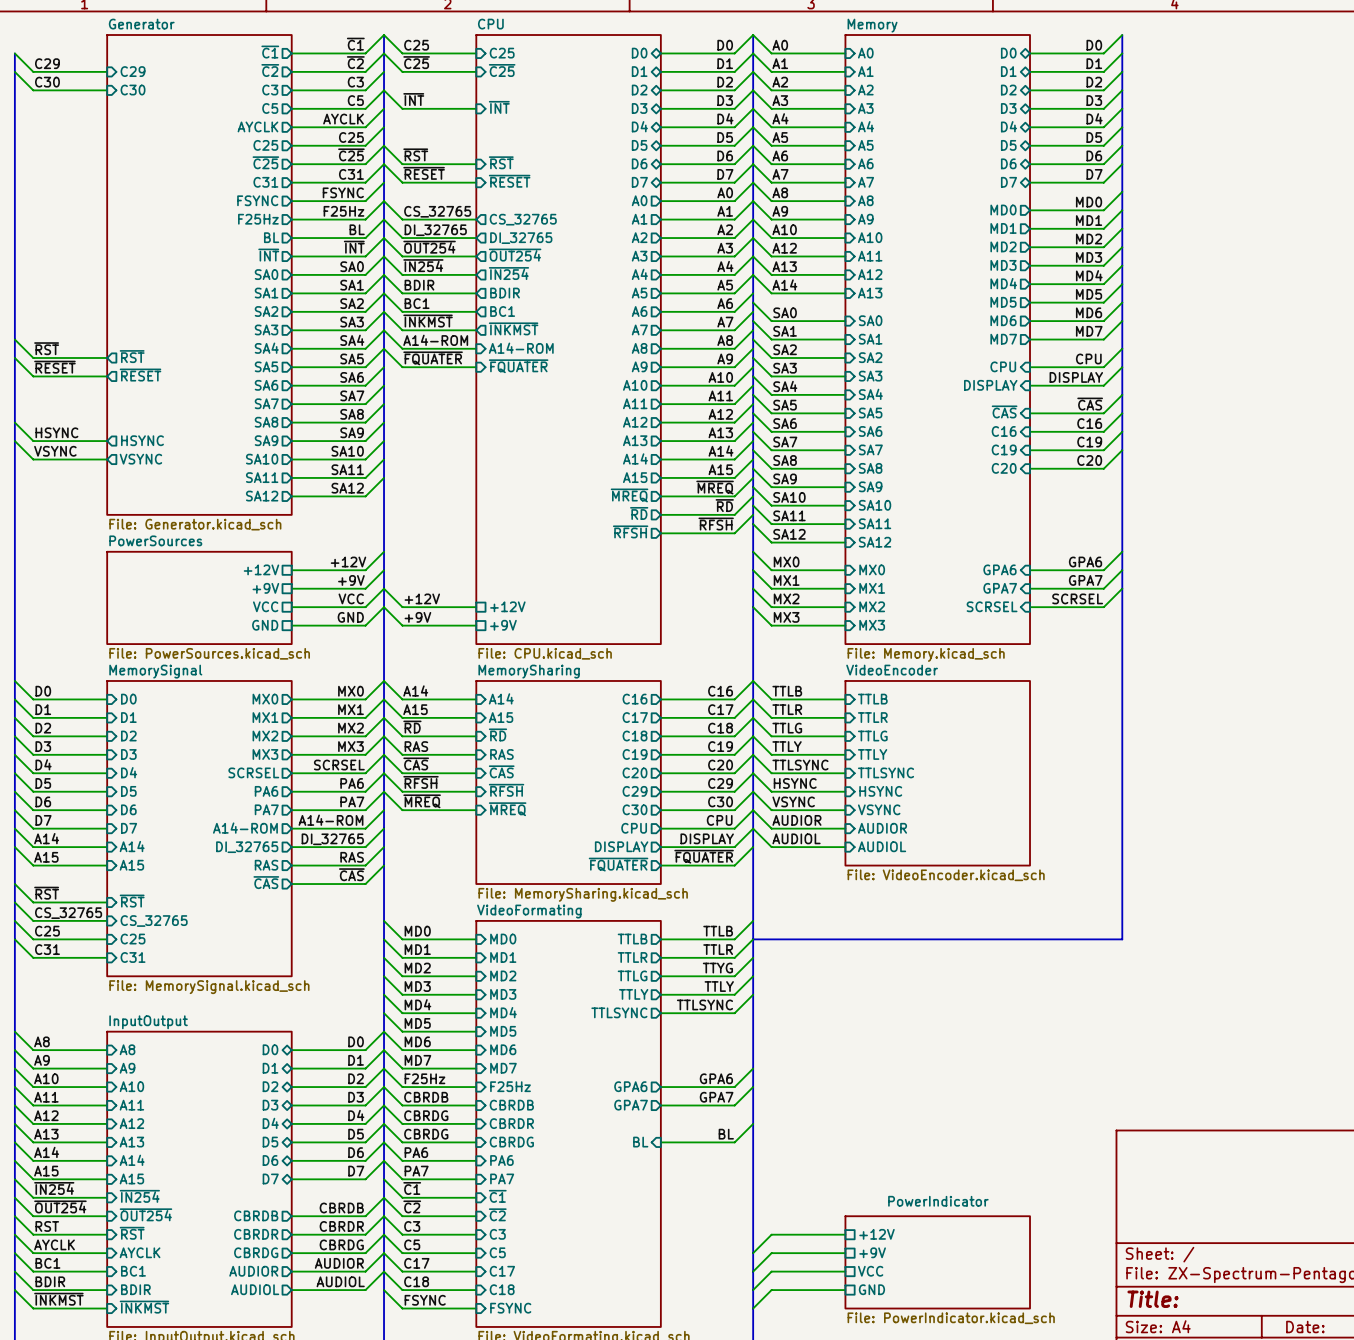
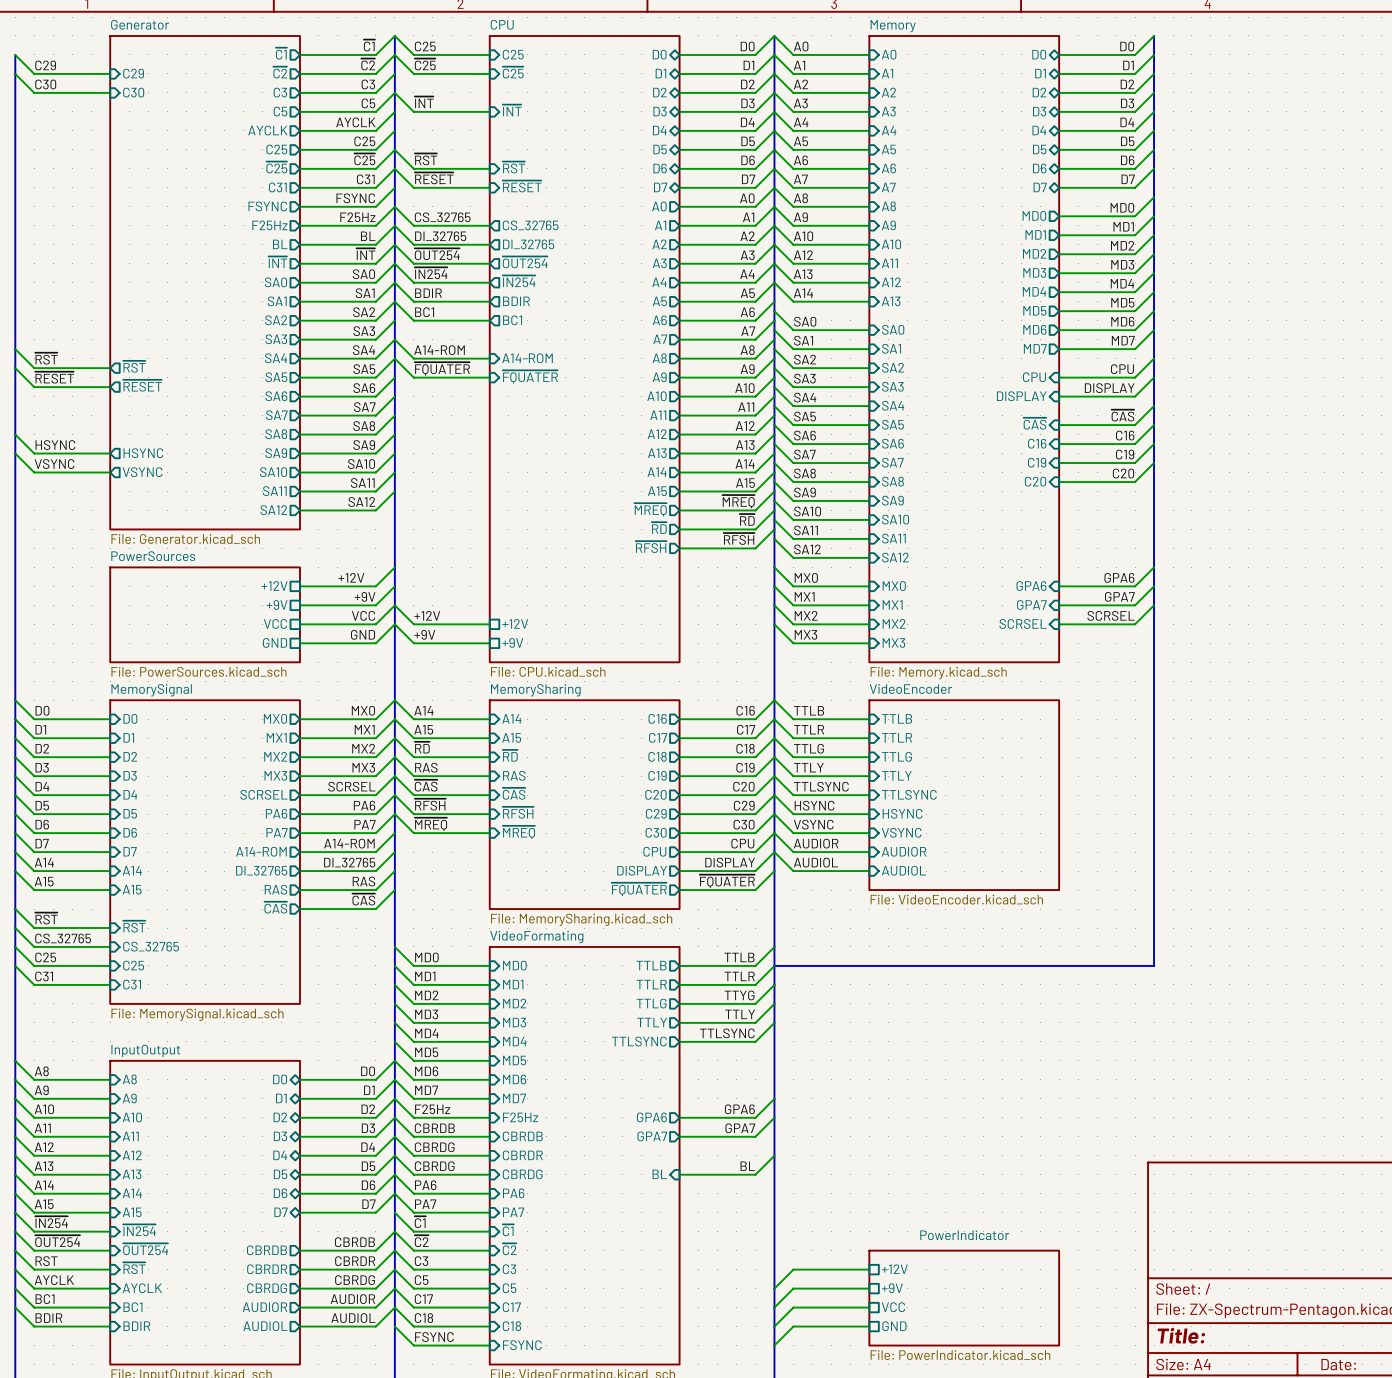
wire: (384, 311) (402, 330) (476, 330) -> none
label: ~{INKMST} (428, 321) -> none
sheet pin: ~{INKMST} (513, 328) -> none
wire: (14, 1290) (33, 1308) (107, 1308) -> none
label: ~{INKMST} (58, 1299) -> none
sheet pin: ~{INKMST} (144, 1307) -> none

